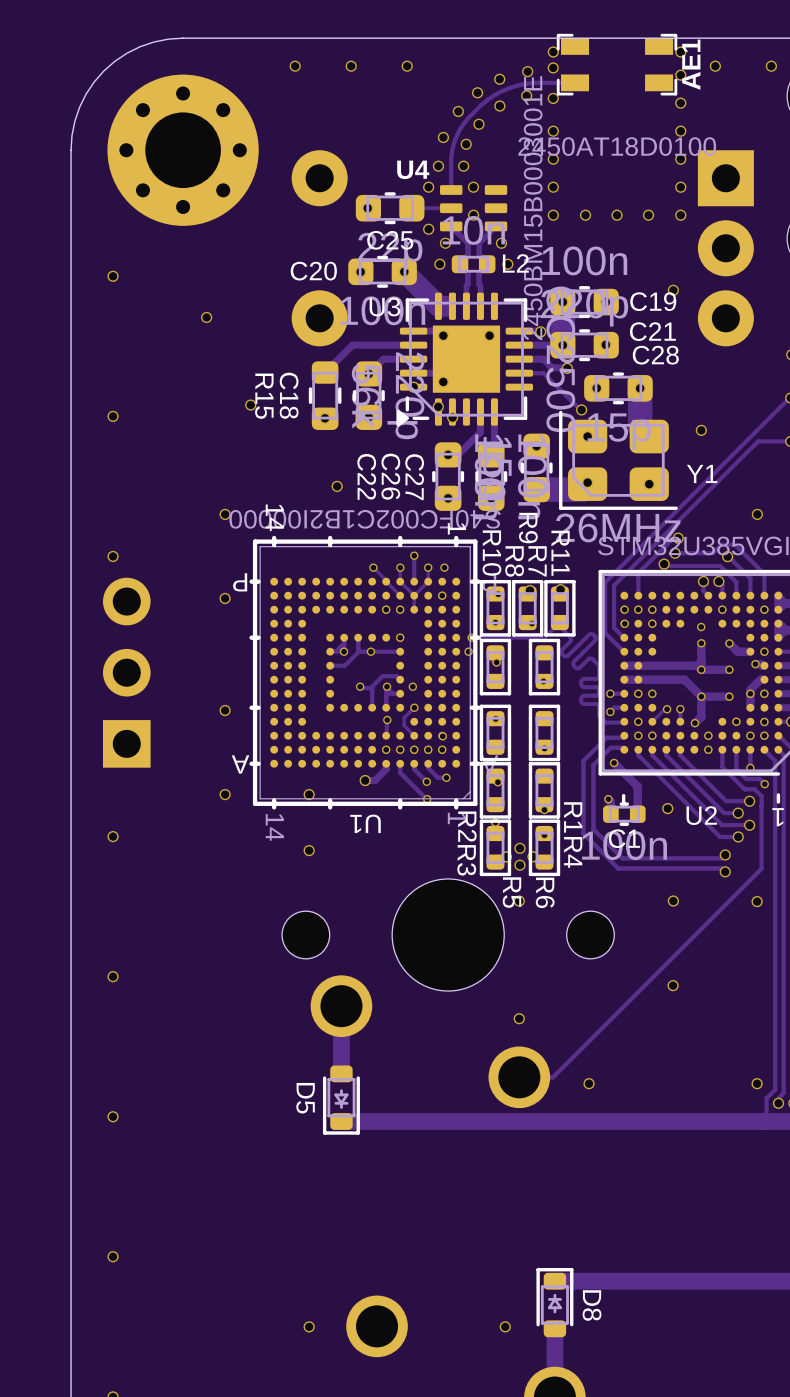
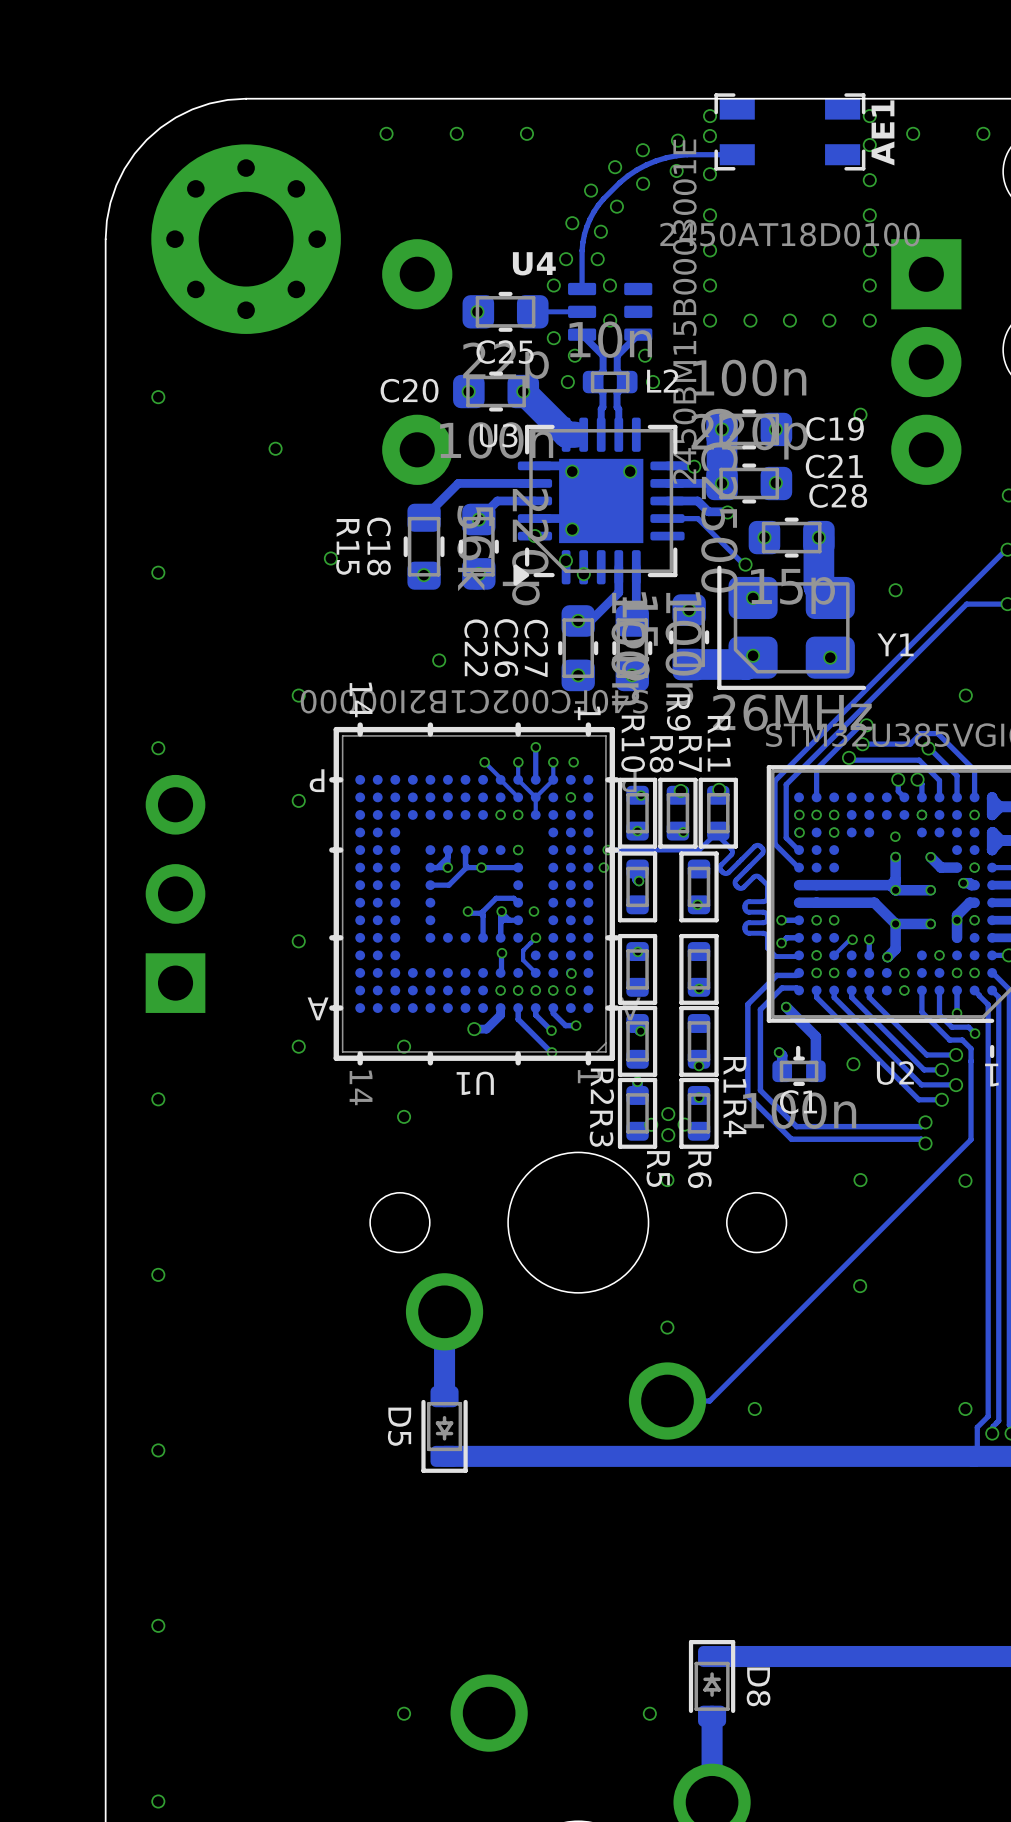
via: (764, 722) -> none

